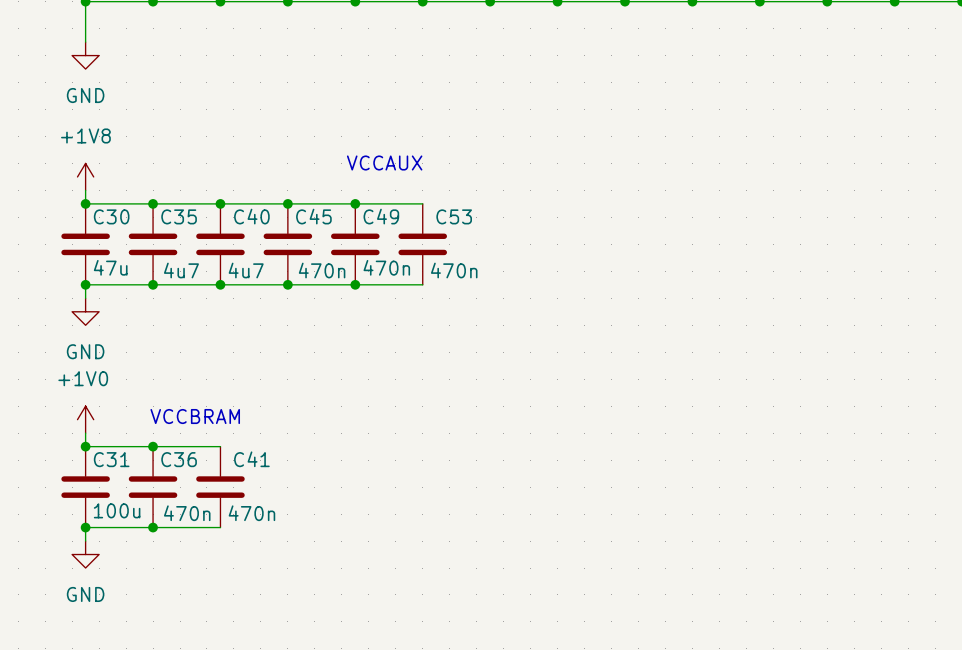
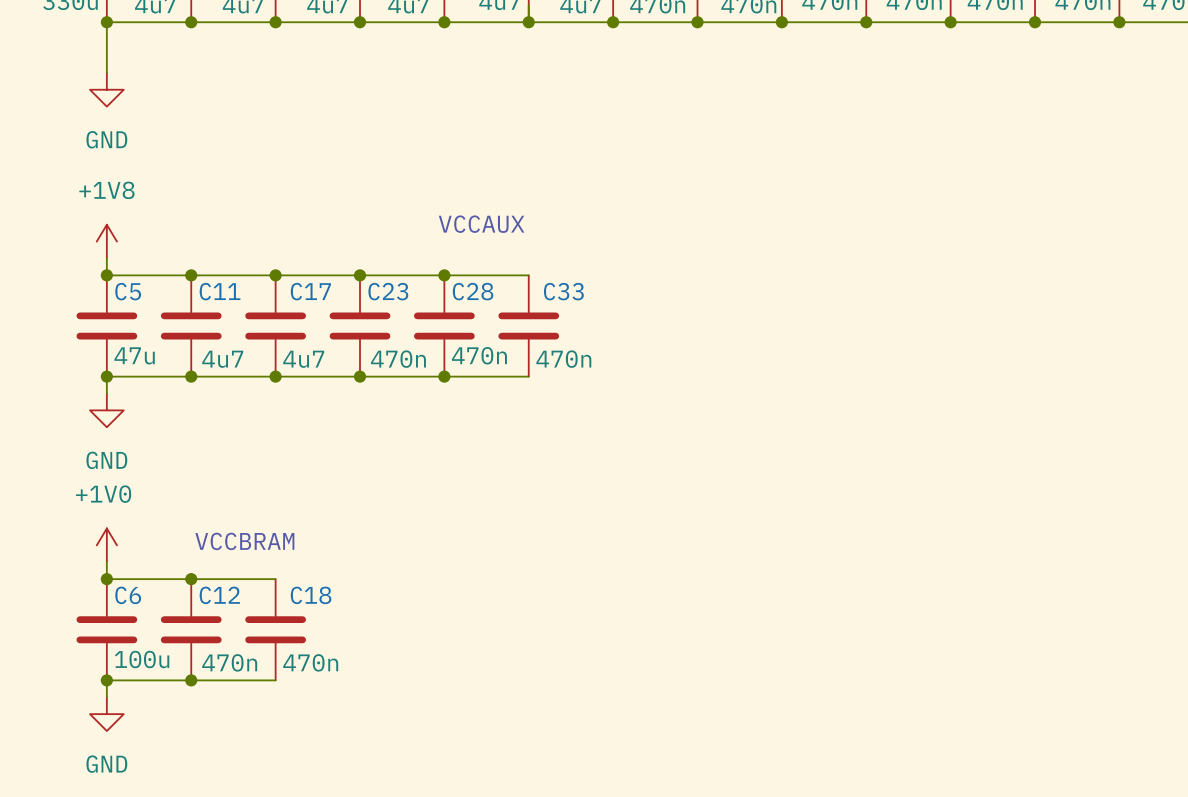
C30 name: C30 (111, 216) -> C5 (128, 291)
C35 name: C35 (179, 216) -> C11 (220, 291)
C40 name: C40 (251, 216) -> C17 (310, 291)
C45 name: C45 (313, 216) -> C23 (388, 291)
C49 name: C49 (381, 216) -> C28 (473, 291)
C53 name: C53 (454, 216) -> C33 (563, 291)
C31 name: C31 (111, 459) -> C6 (128, 595)
C36 name: C36 (179, 459) -> C12 (219, 595)
C41 name: C41 (251, 459) -> C18 (311, 595)

